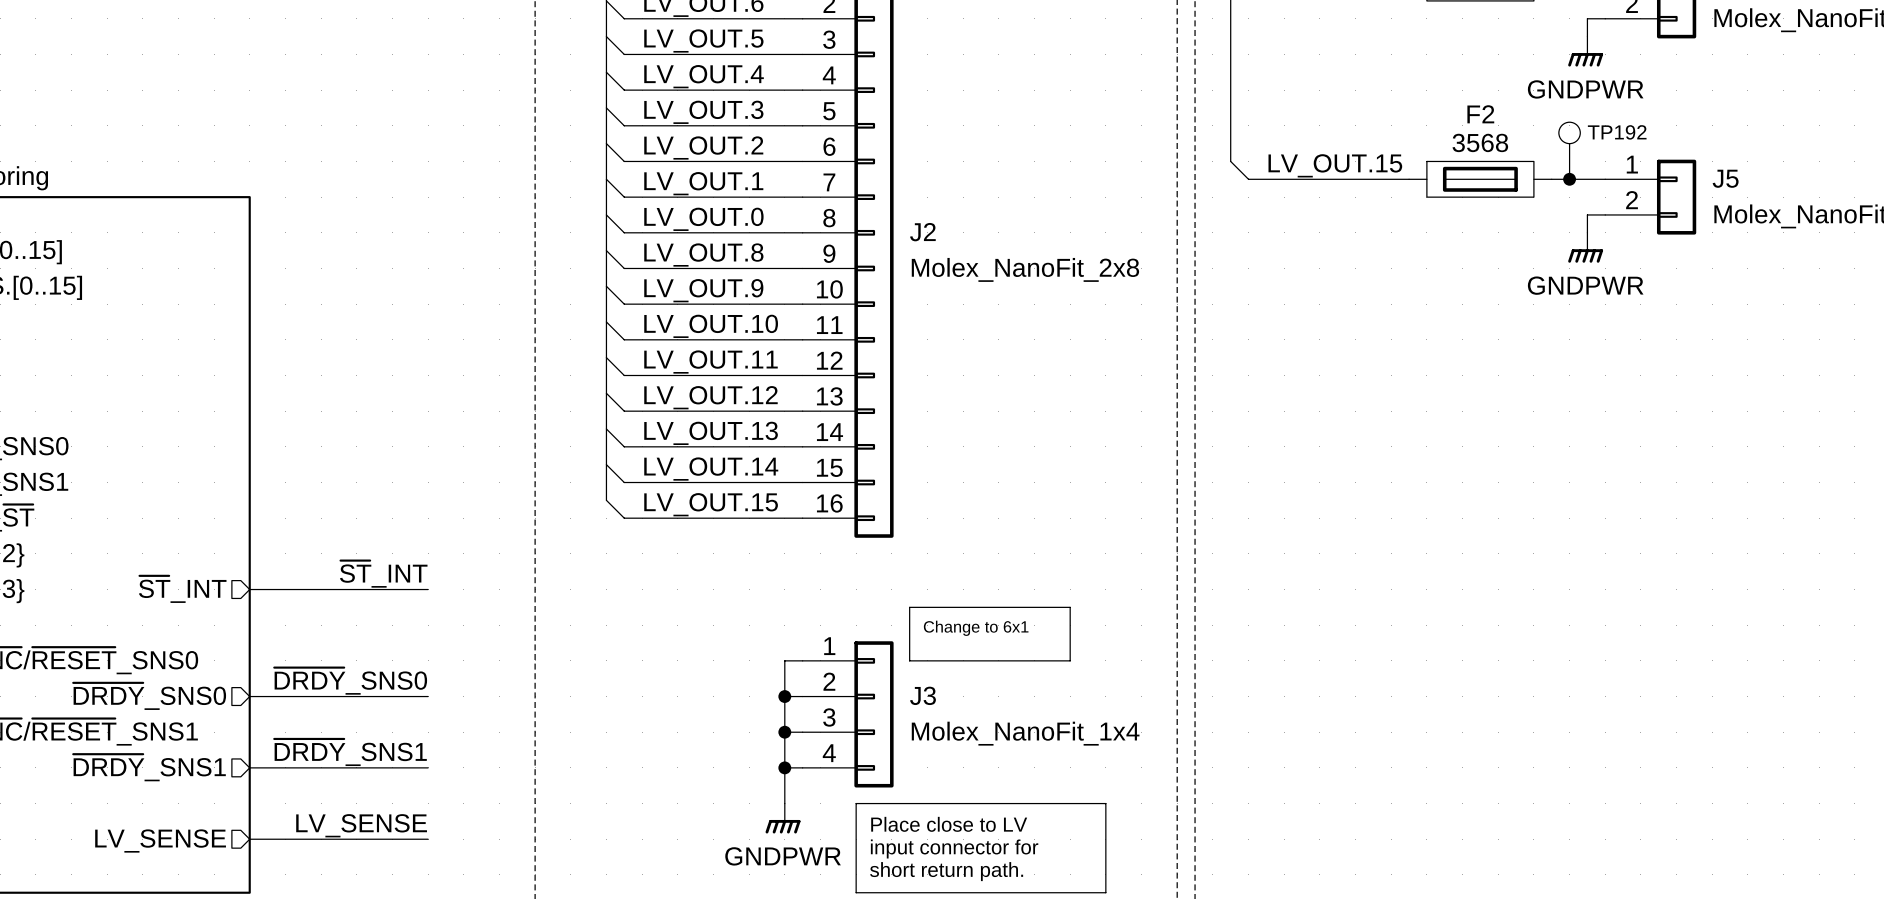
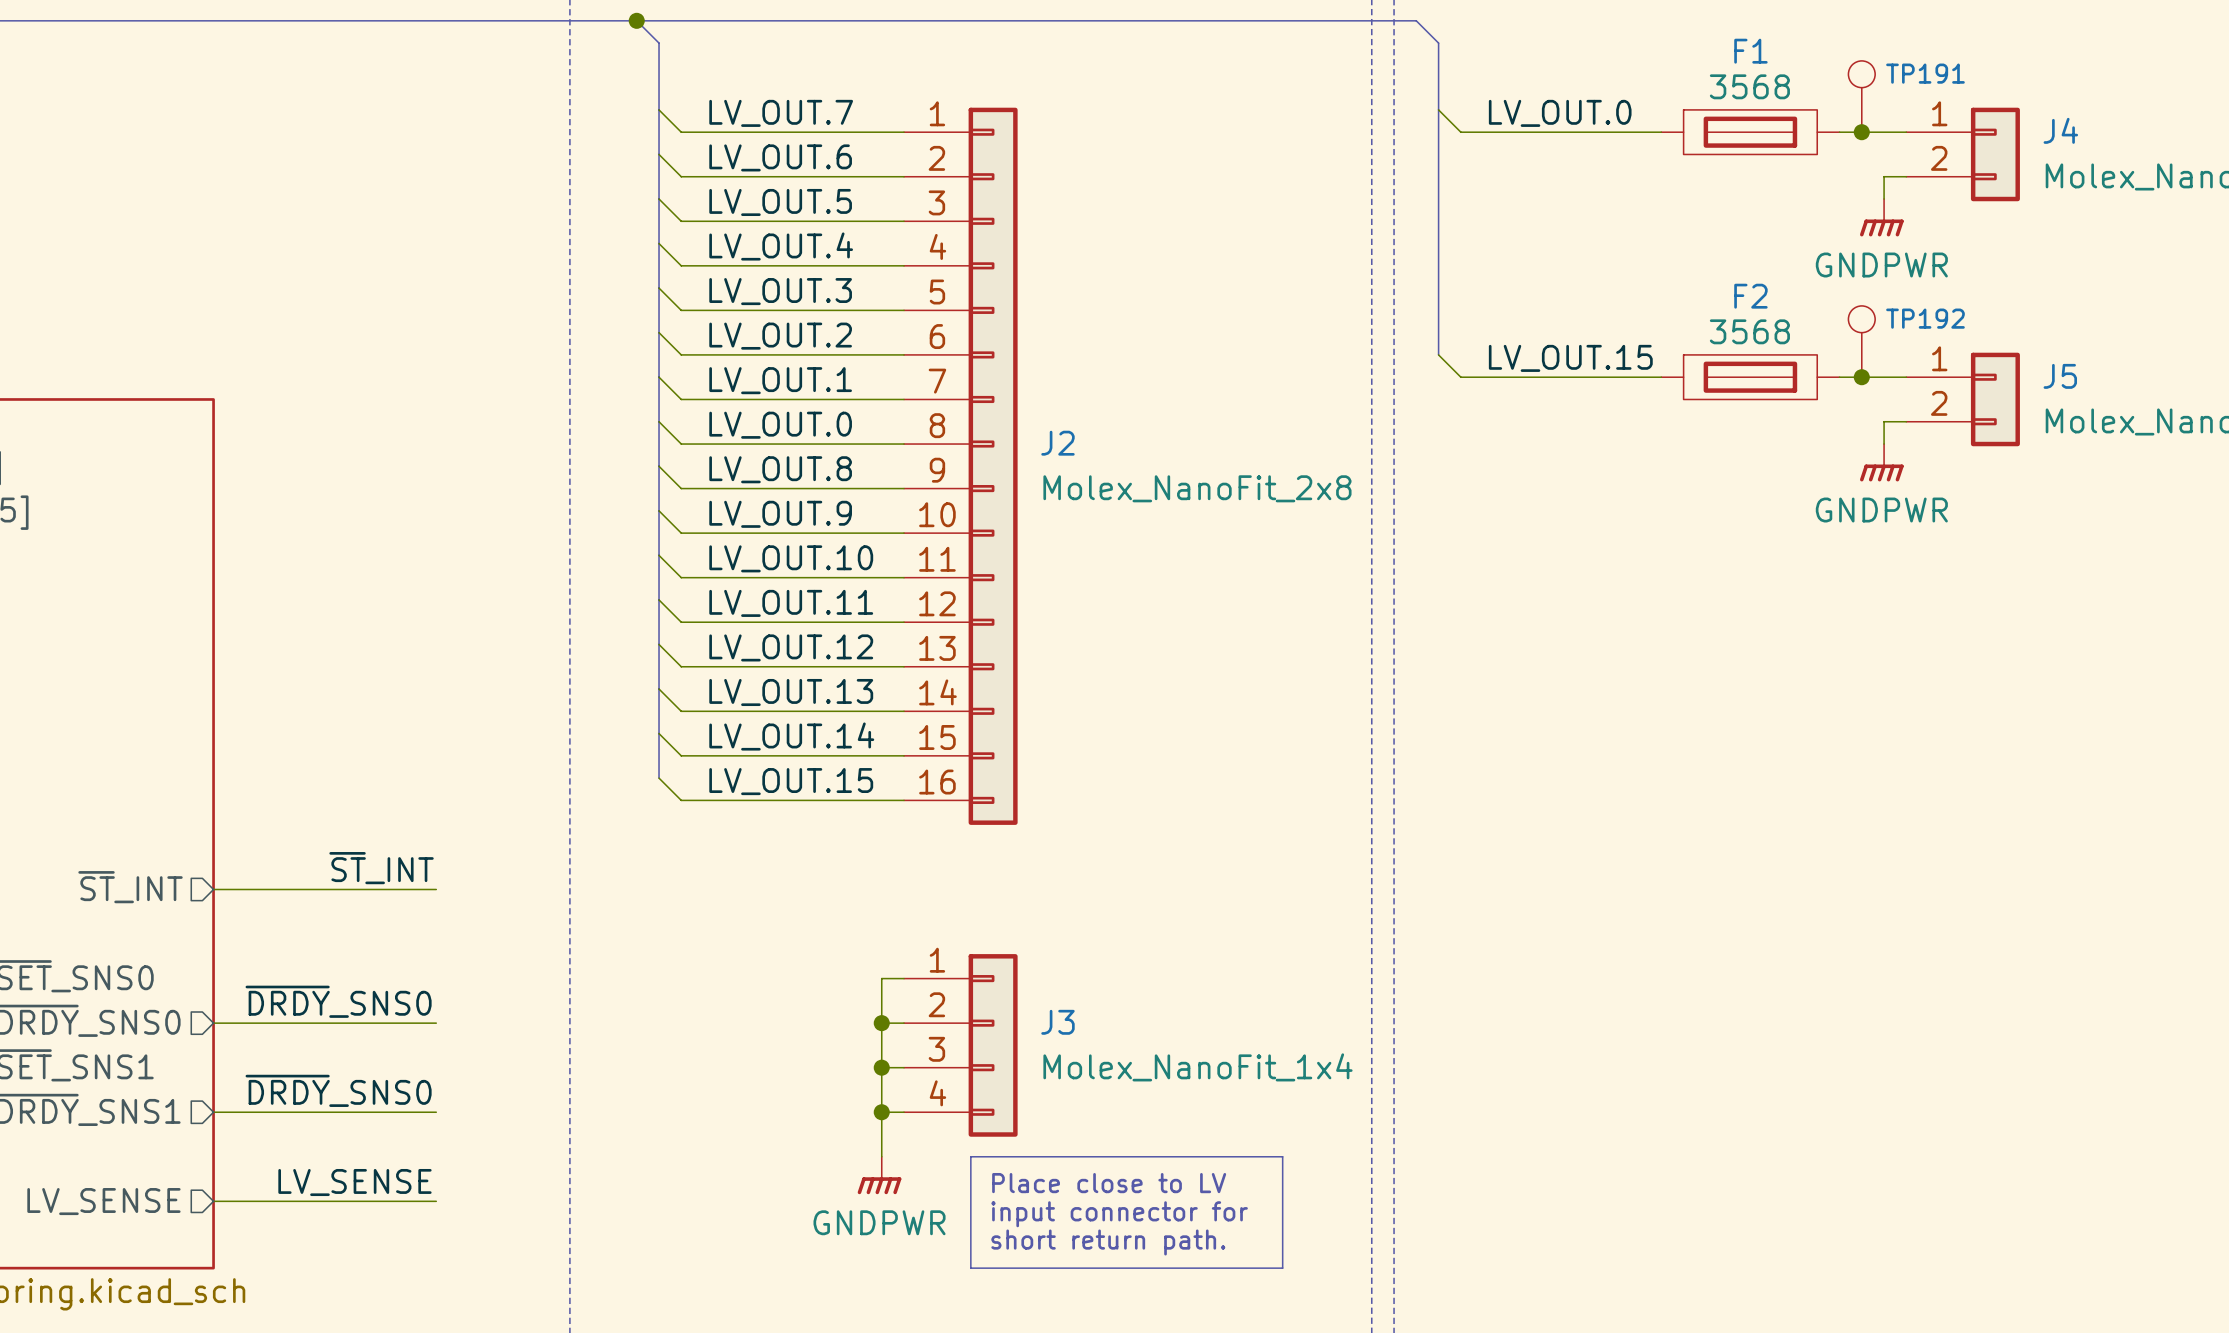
line: (909, 607) (1070, 607) (1070, 660) (909, 660) (909, 607) -> none
text: Change to 6x1 (976, 628) -> none
label: ~{DRDY}_SNS1 (350, 752) -> ~{DRDY}_SNS0 (338, 1090)

